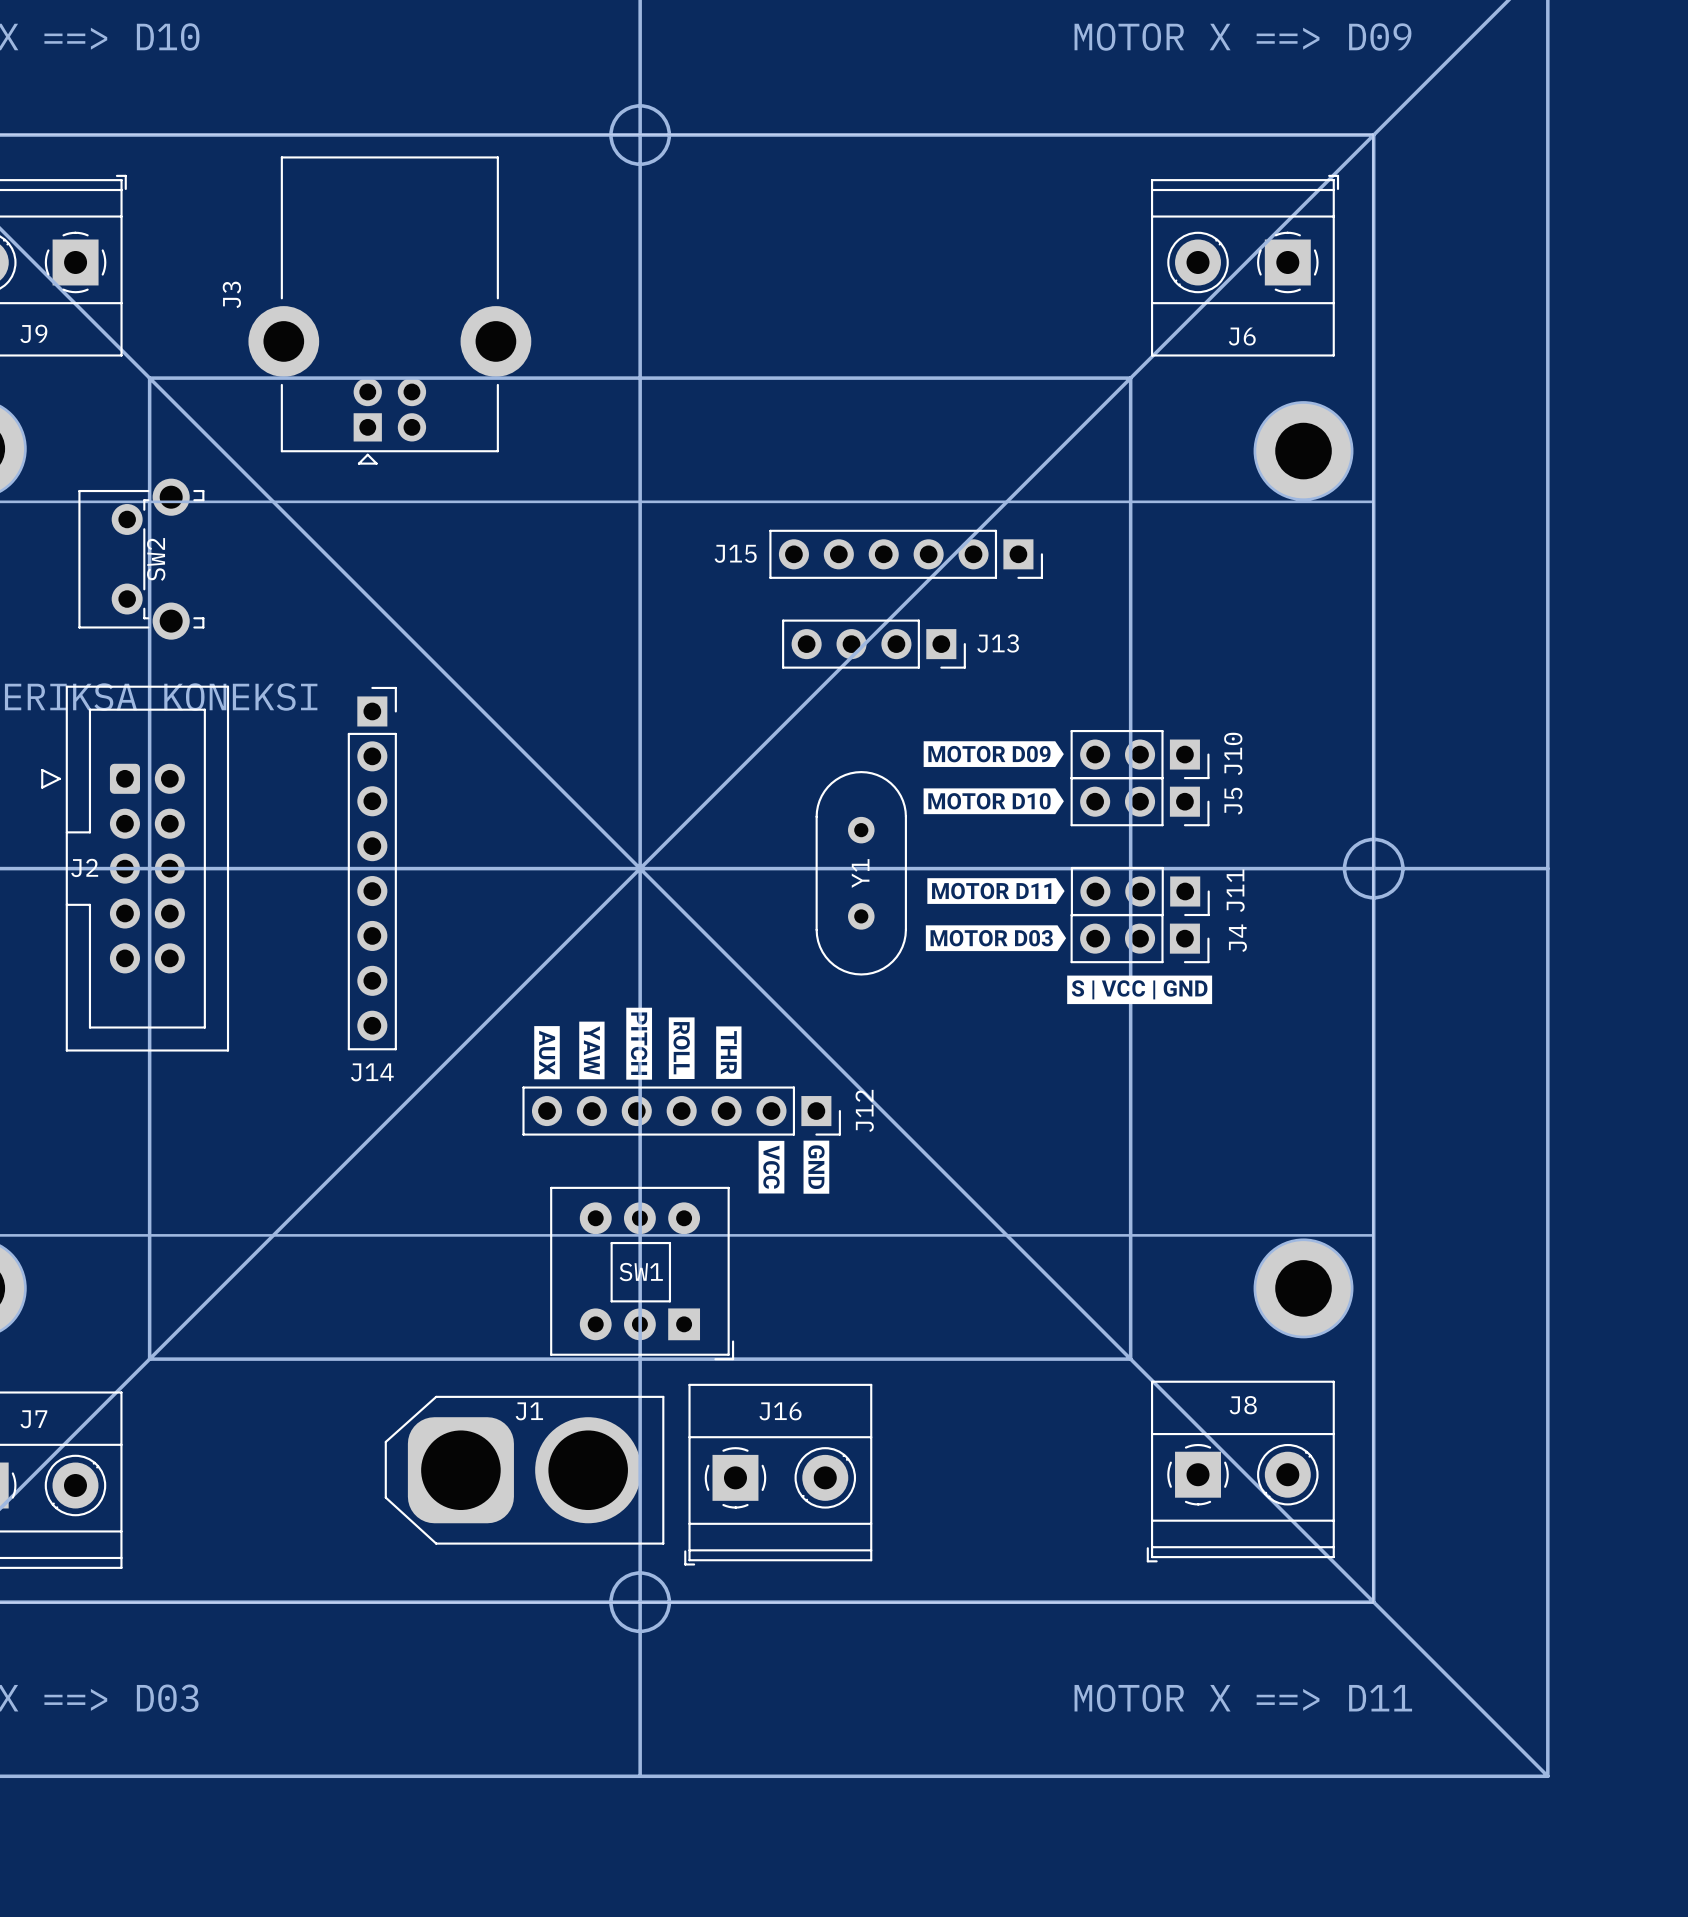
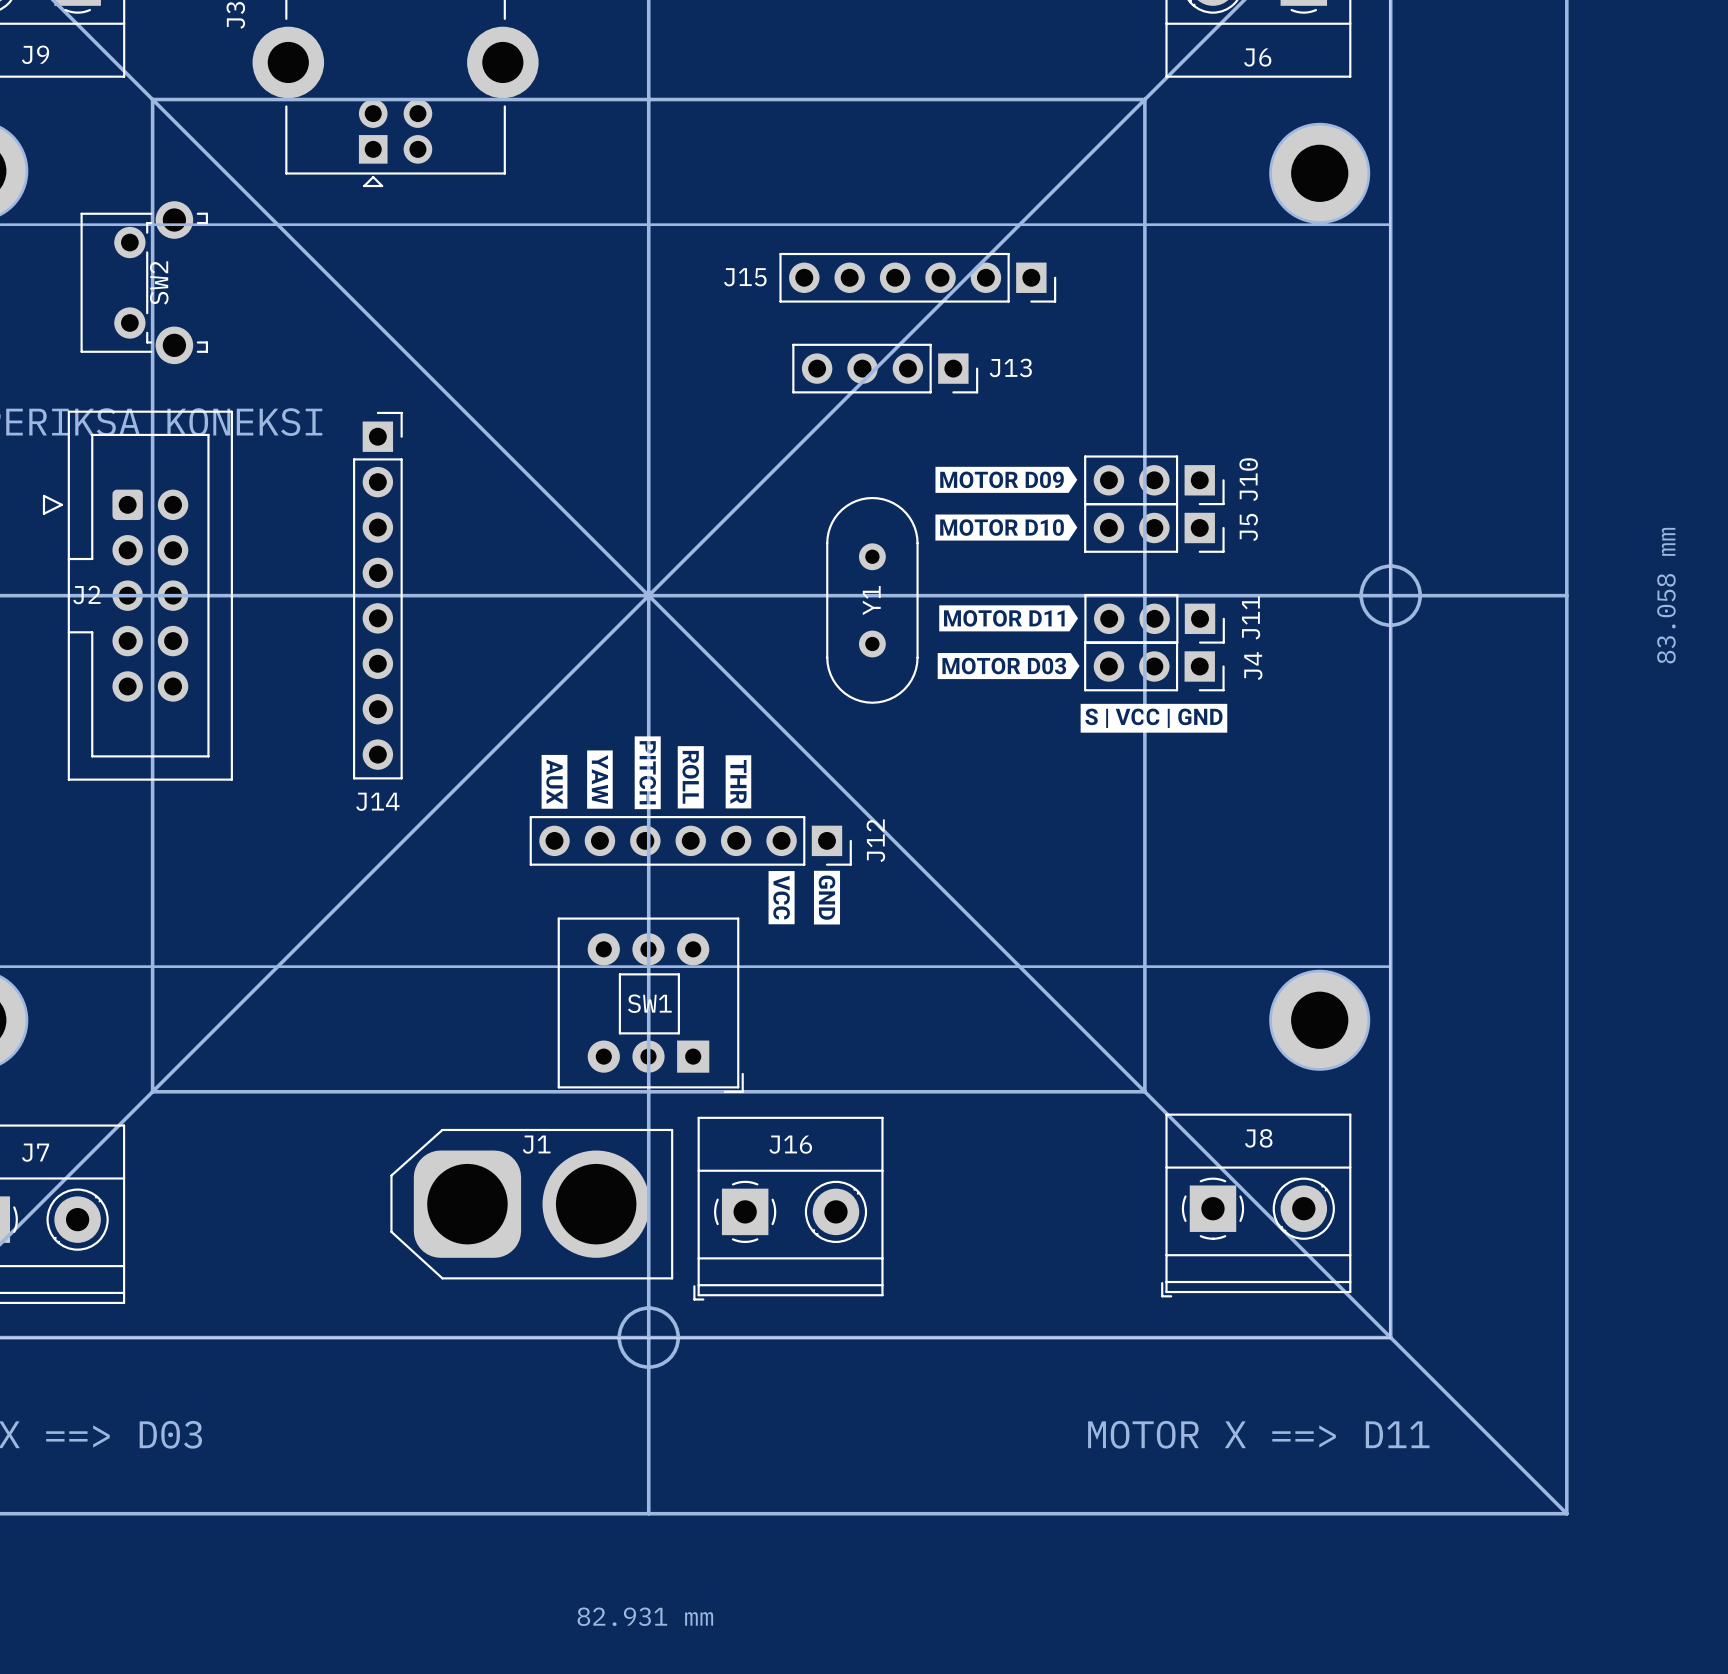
text: none -> 83.058 mm (1666, 595)
text: none -> 82.931 mm (645, 1616)

